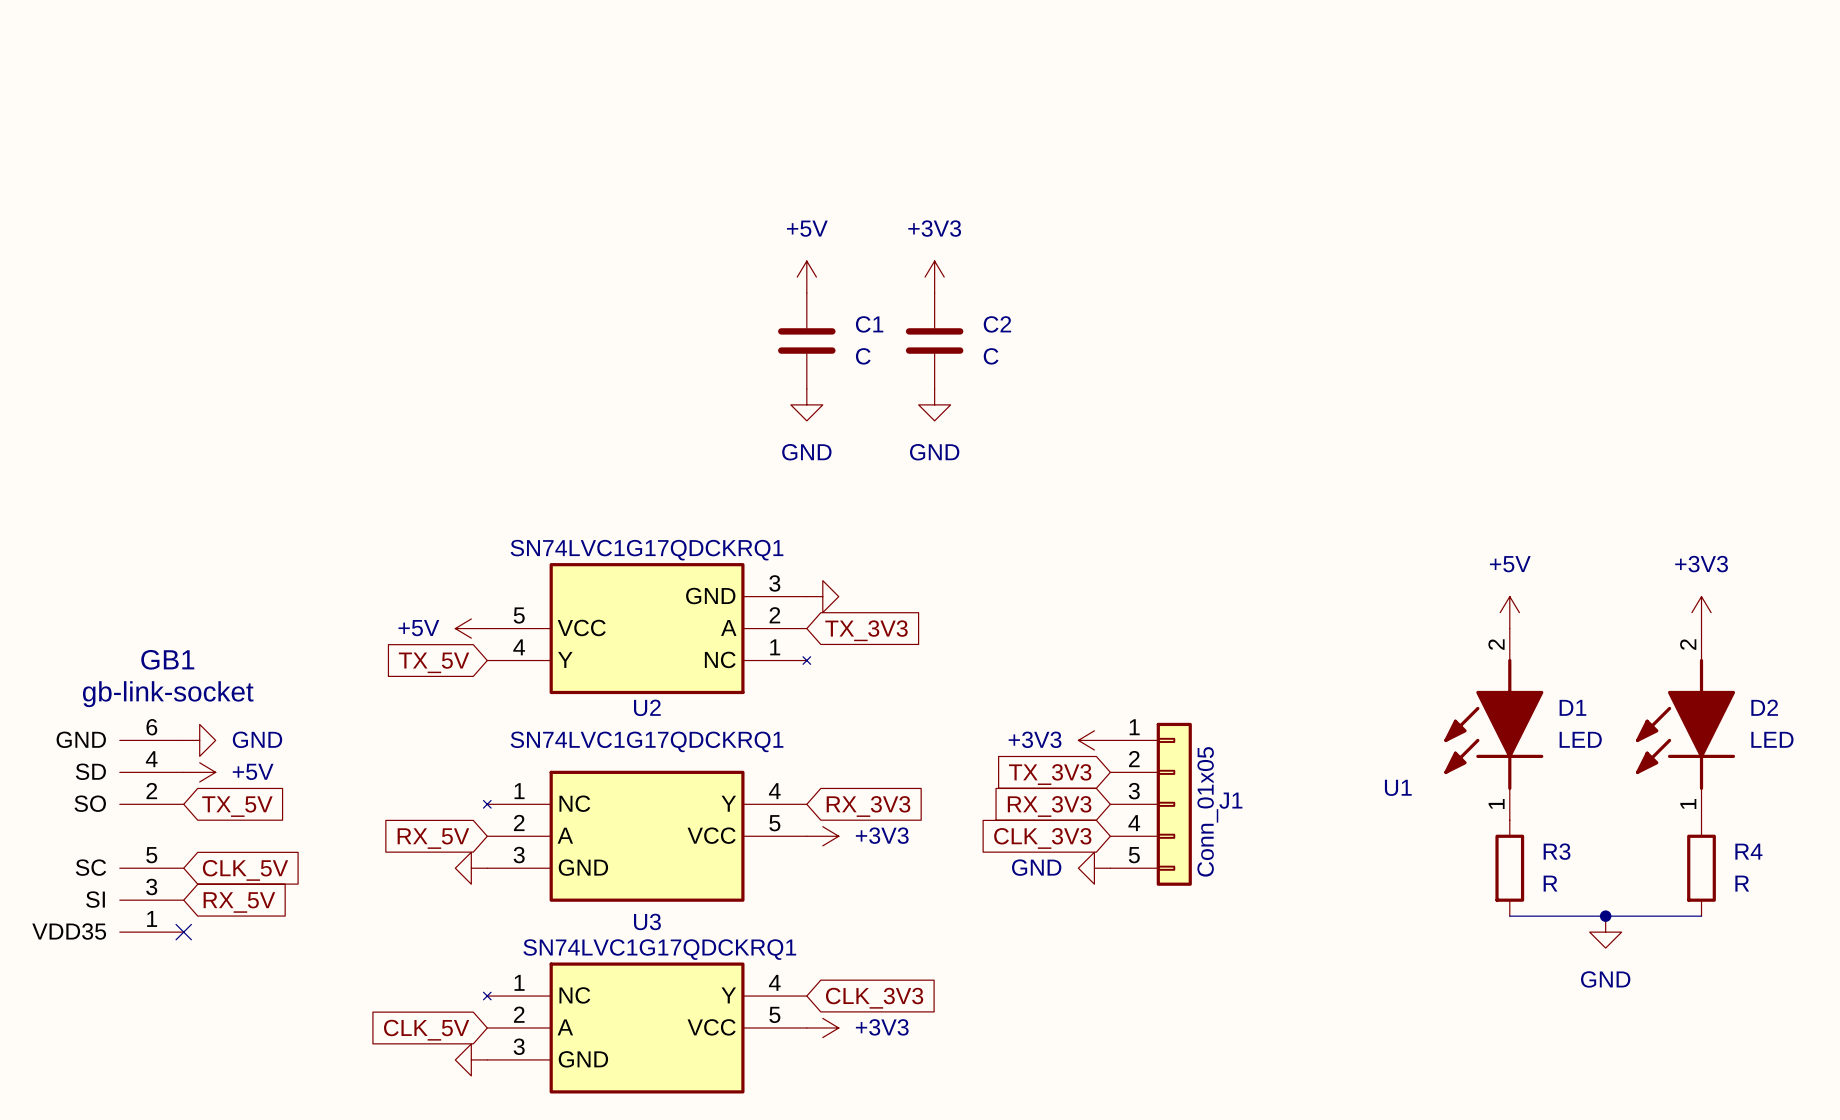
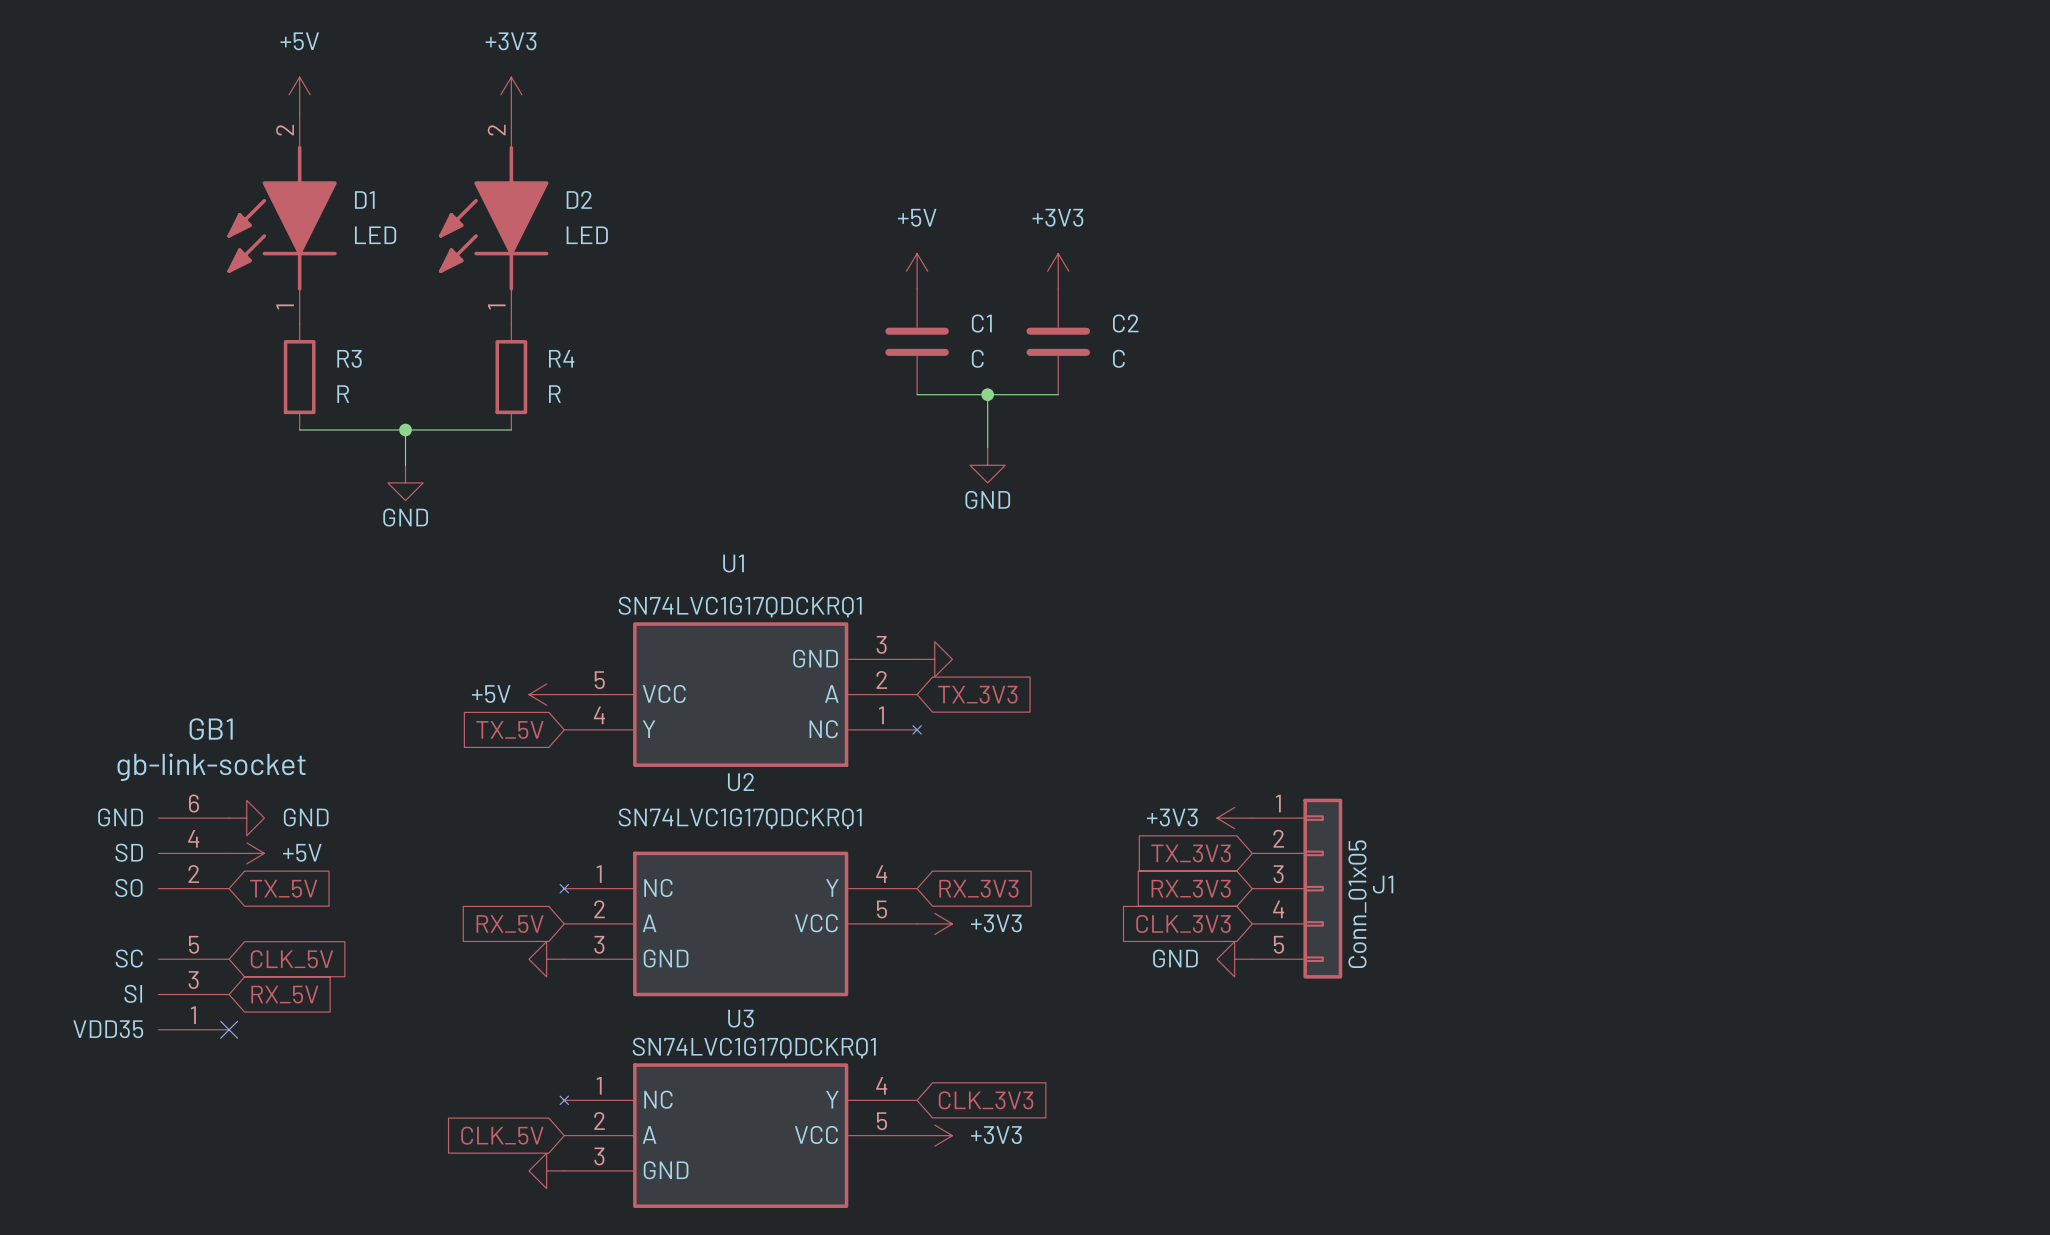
power symbol: none -> +5V (299, 94)
power symbol: none -> +3V3 (511, 94)
power symbol position: +5V (806, 277) -> +5V (917, 271)
power symbol position: +3V3 (934, 277) -> +3V3 (1058, 271)
C1 position: (806, 340) -> (917, 341)
C2 position: (934, 340) -> (1058, 341)
wire: none -> (917, 394) (1058, 394)
wire: none -> (987, 394) (987, 447)
junction: none -> (987, 394)
wire: none -> (299, 429) (511, 429)
wire: none -> (405, 429) (405, 465)
junction: none -> (405, 429)
power symbol: GND (806, 404) -> none
power symbol: GND (934, 404) -> none
power symbol: none -> GND (987, 465)
power symbol: none -> GND (405, 482)
power symbol: +5V (1509, 612) -> none
power symbol: +3V3 (1701, 612) -> none
D1 position: (1493, 724) -> (282, 218)
D2 position: (1685, 724) -> (493, 218)
U1 name position: U1 (1398, 787) -> U1 (733, 563)
R3 position: (1509, 868) -> (299, 377)
R4 position: (1701, 868) -> (511, 377)
wire: (1509, 916) (1701, 916) -> none
junction: (1605, 916) -> none
power symbol: GND (1605, 932) -> none

